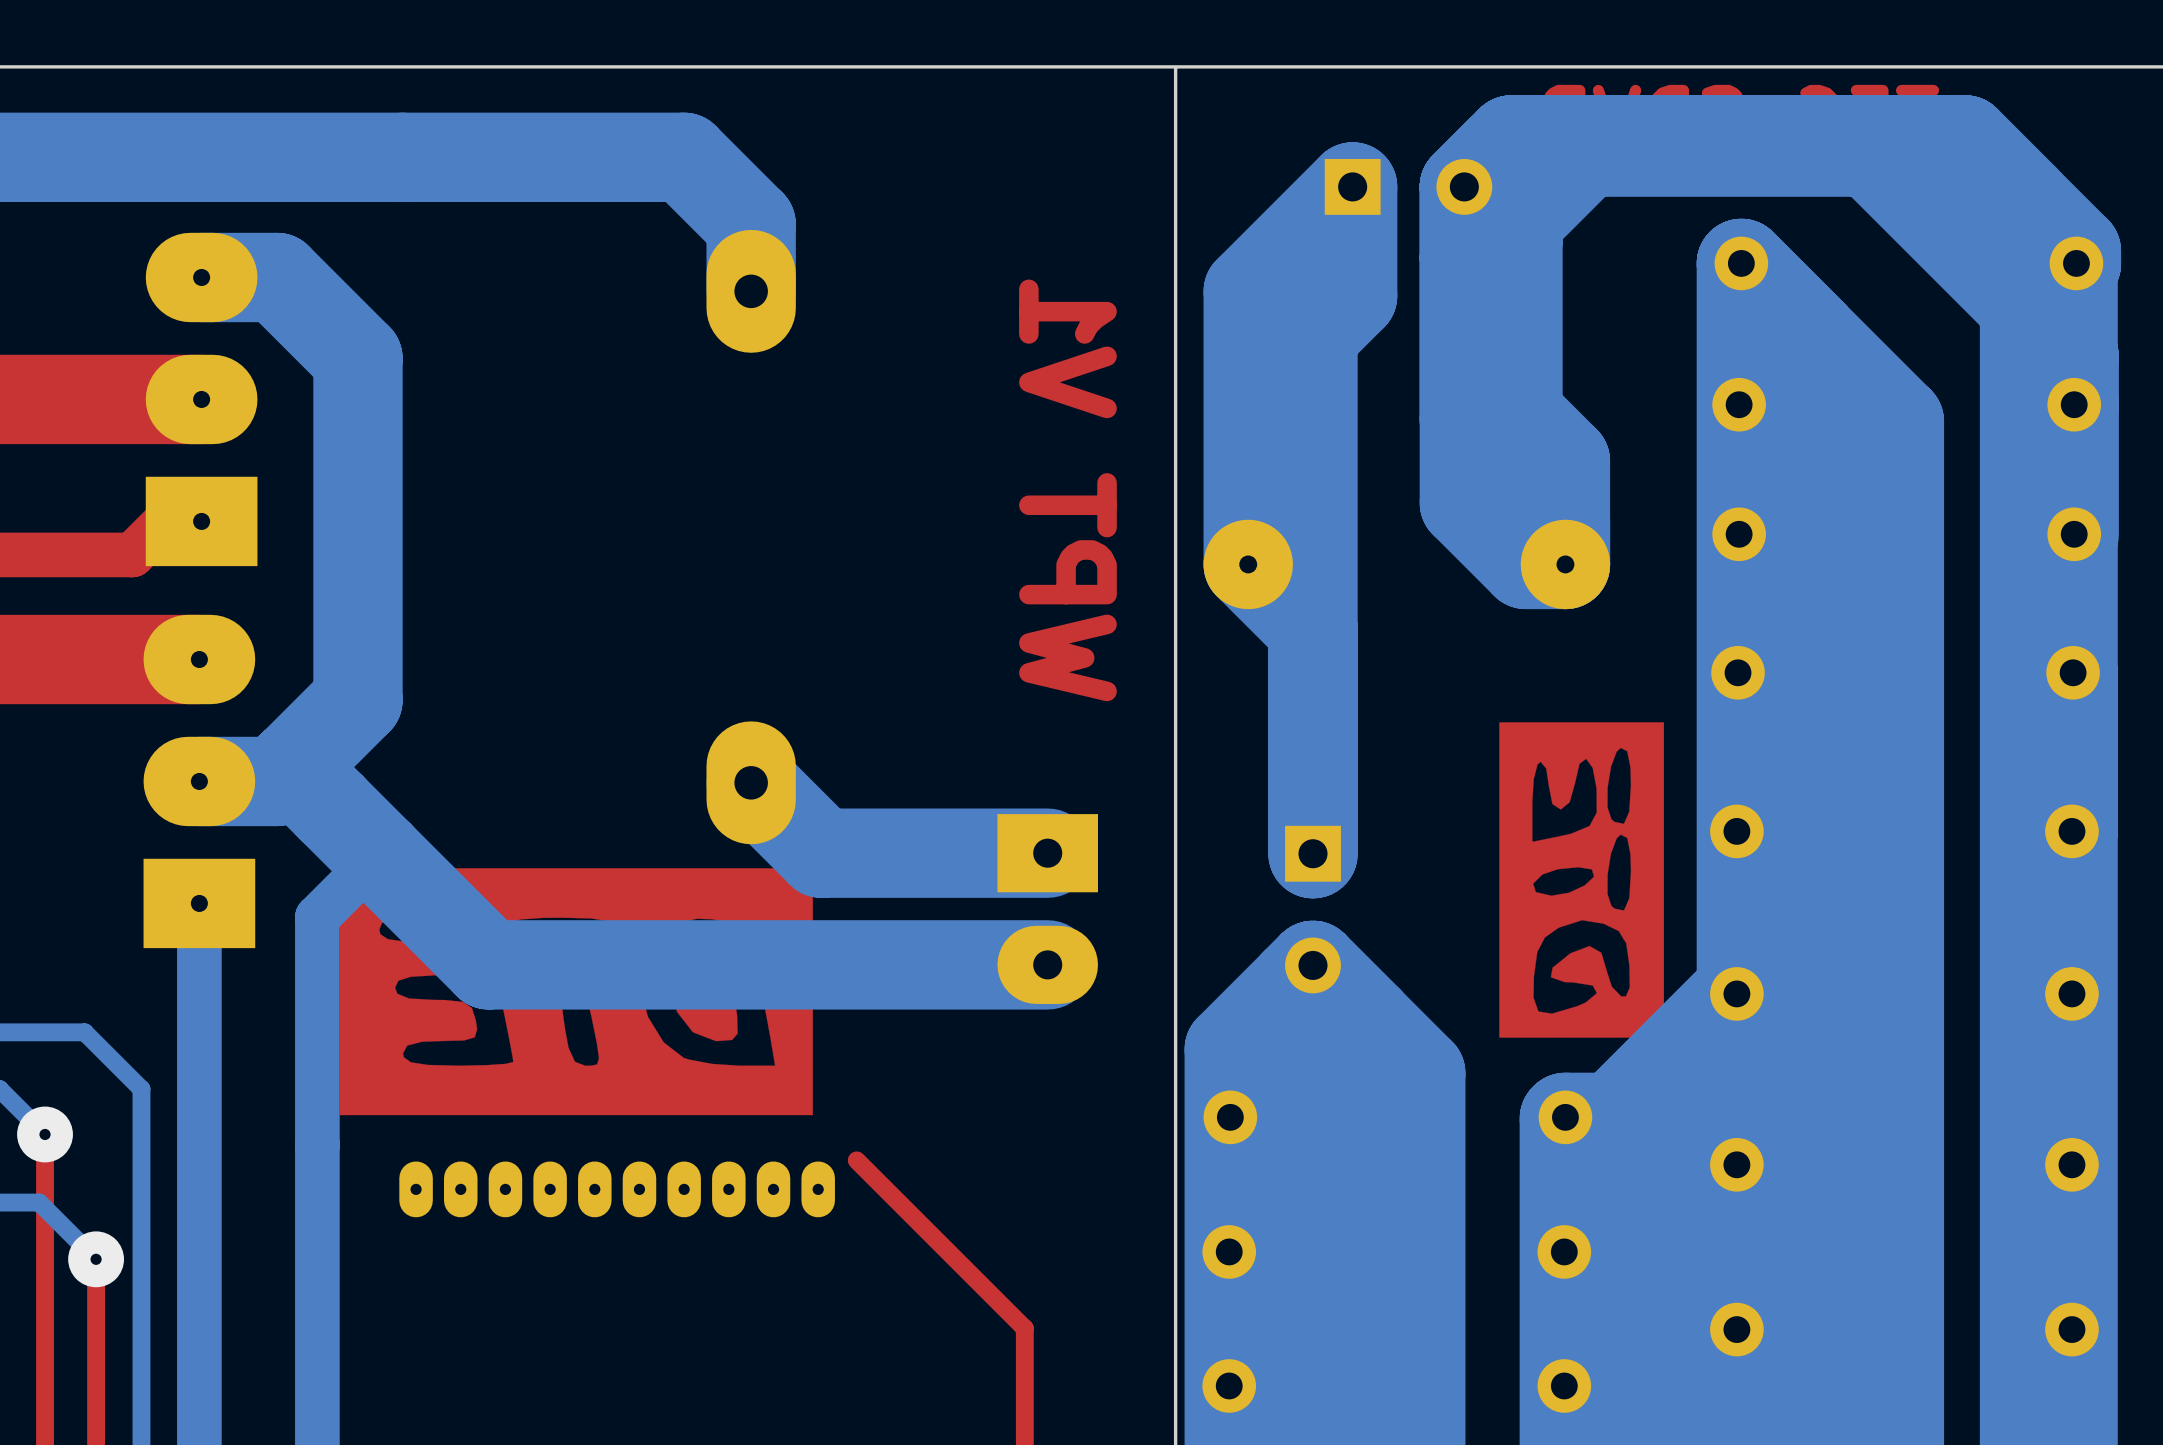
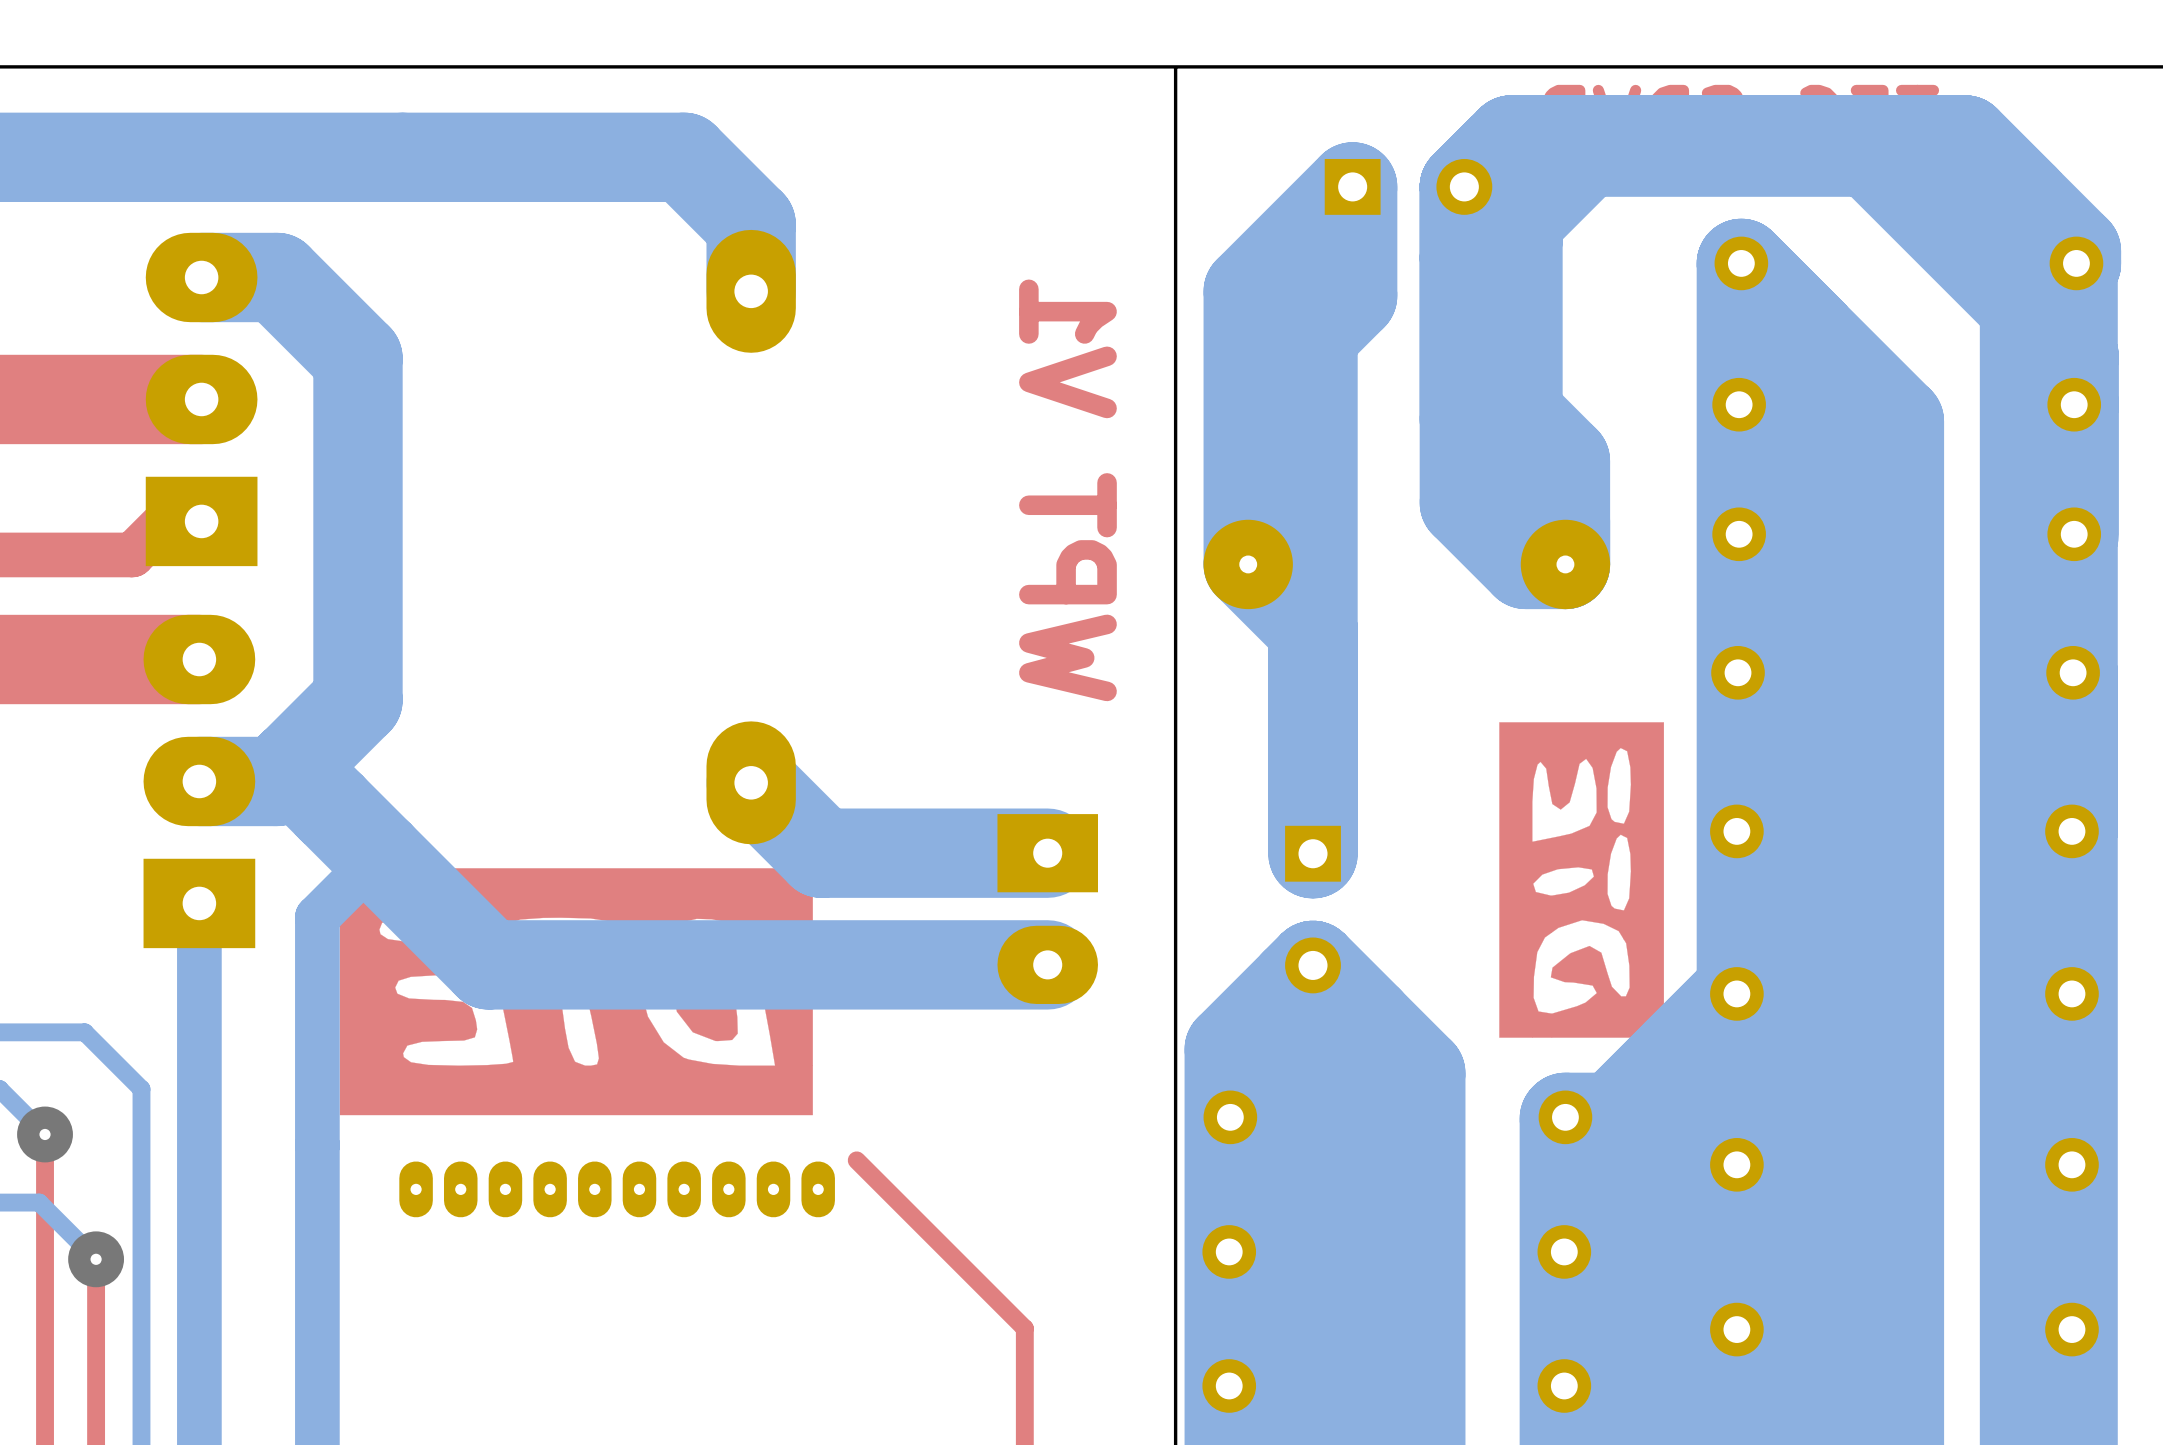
part footprint: [145, 232, 258, 567] -> [145, 232, 258, 567]
part footprint: [143, 614, 256, 949] -> [143, 614, 256, 949]

